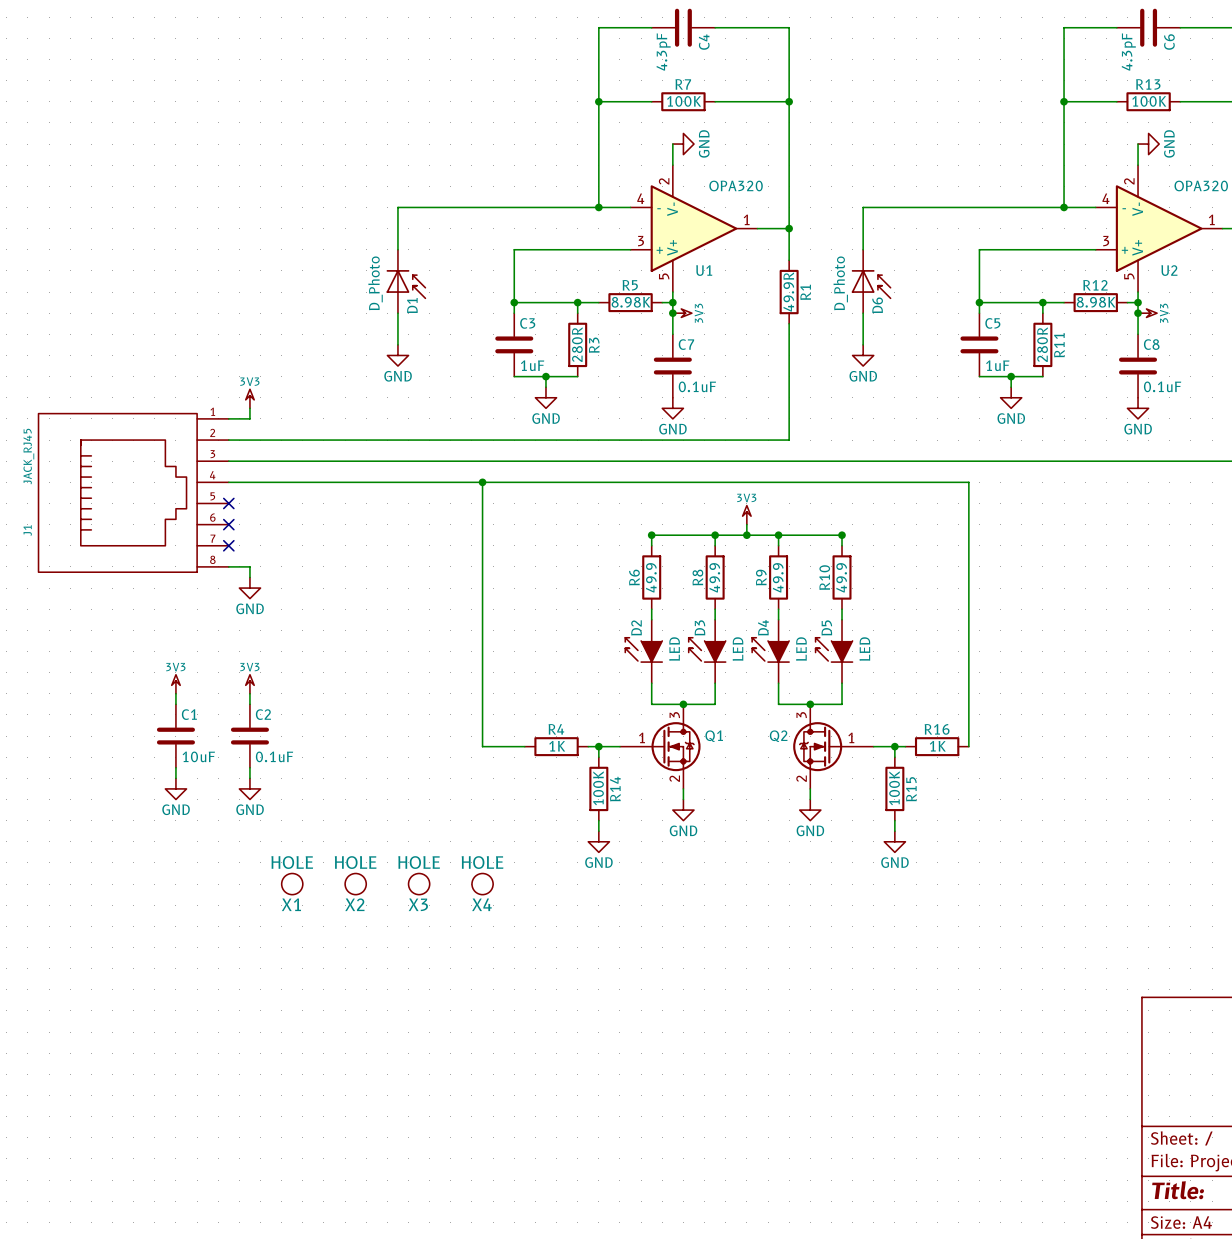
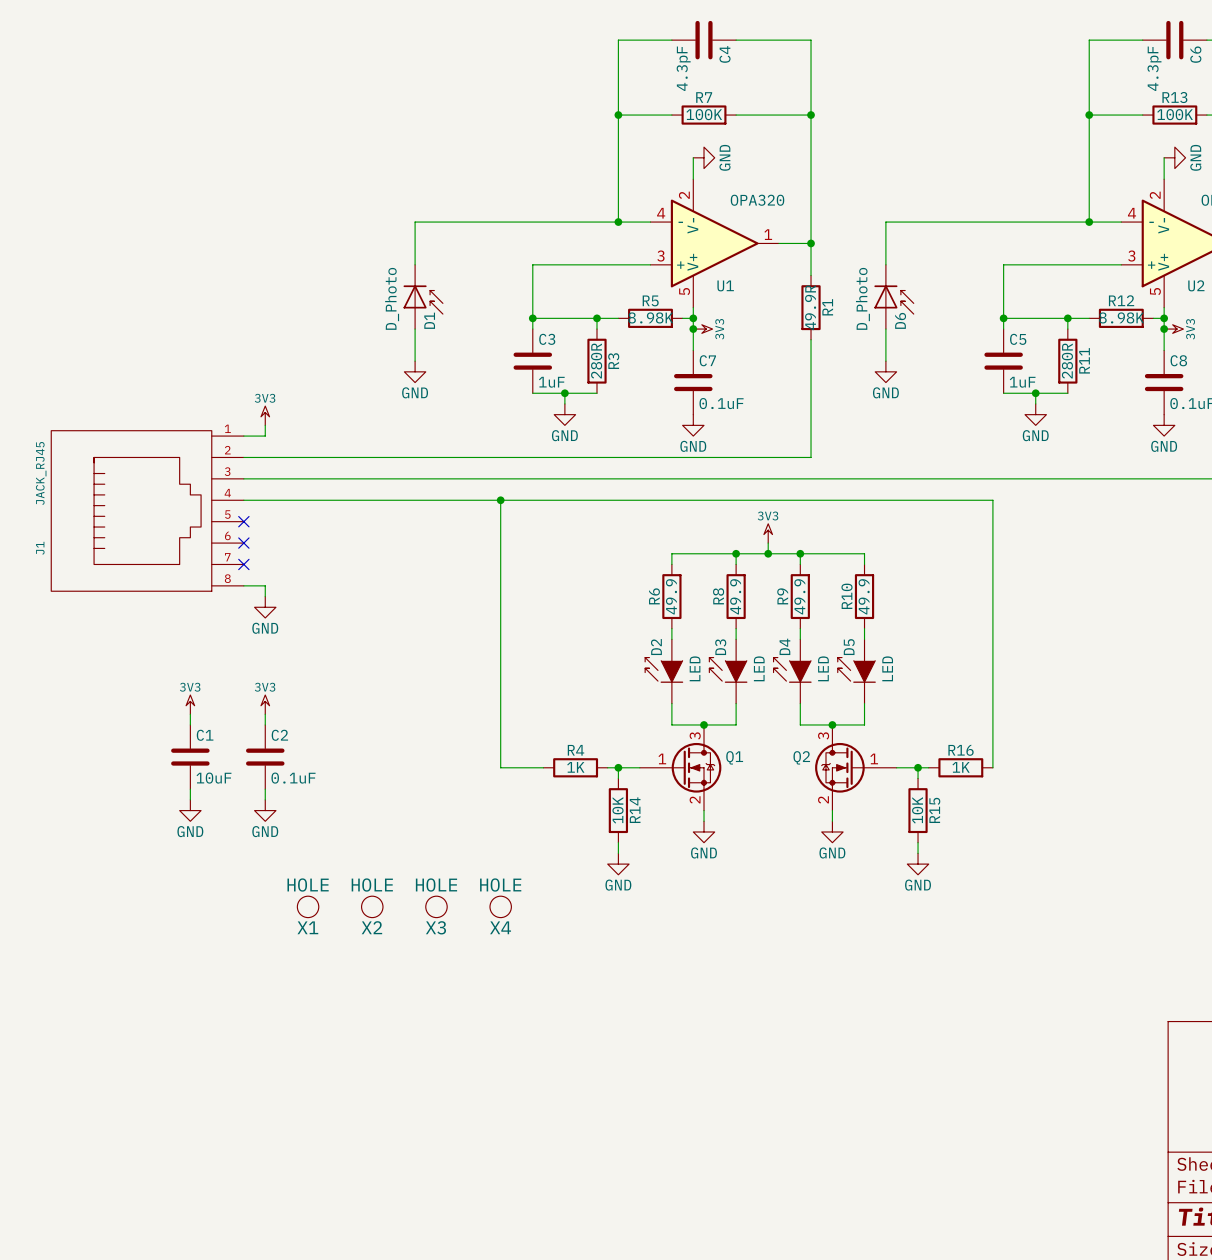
junction: (651, 535) -> none
junction: (842, 535) -> none
R14 value: 100K (598, 788) -> 10K (617, 810)
R15 value: 100K (894, 788) -> 10K (917, 810)

